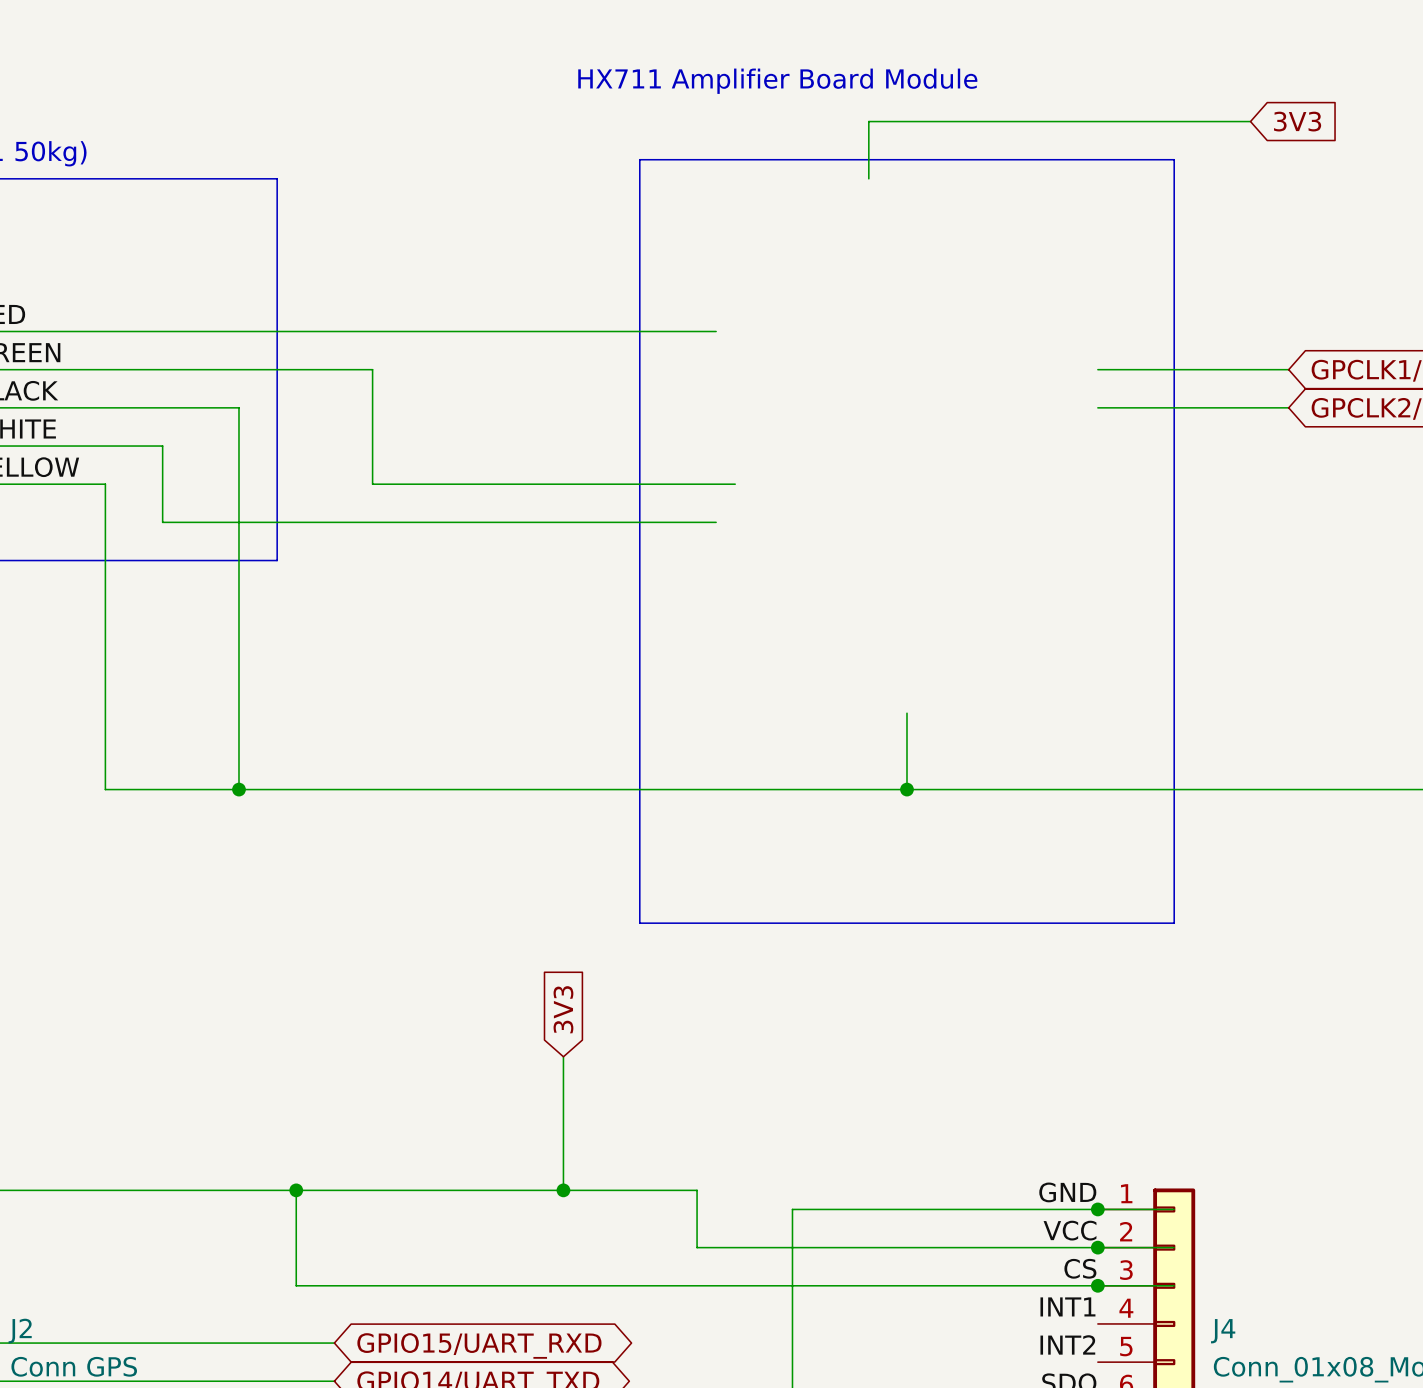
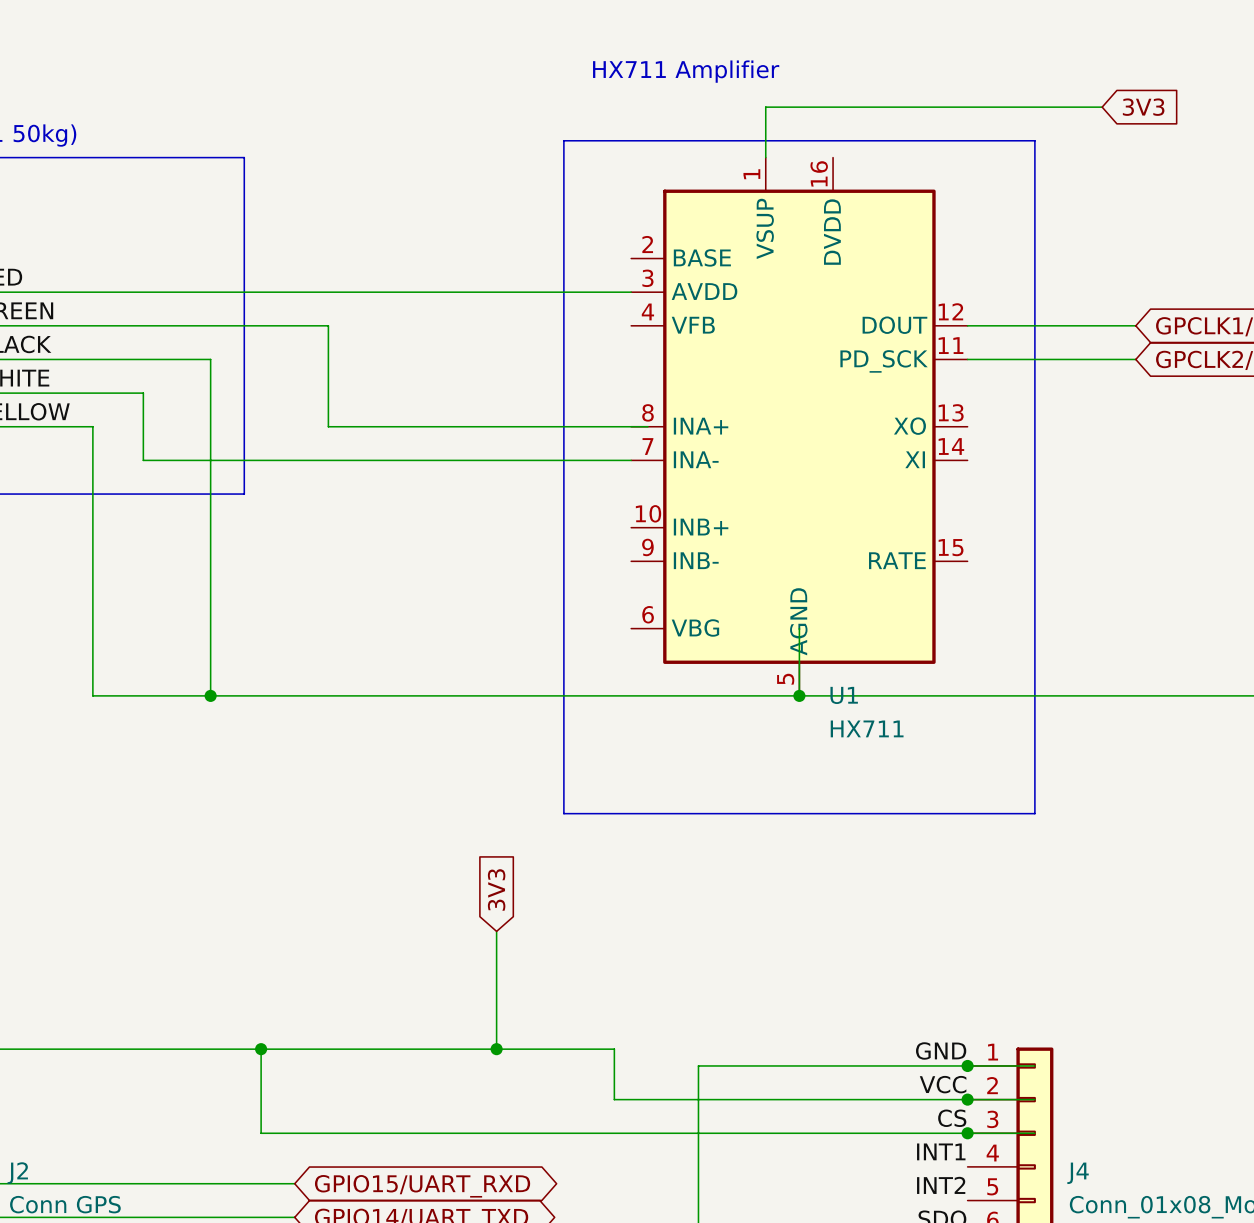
text: HX711 Amplifier Board Module (777, 81) -> HX711 Amplifier (686, 71)
U1: none -> HX711 (799, 426)

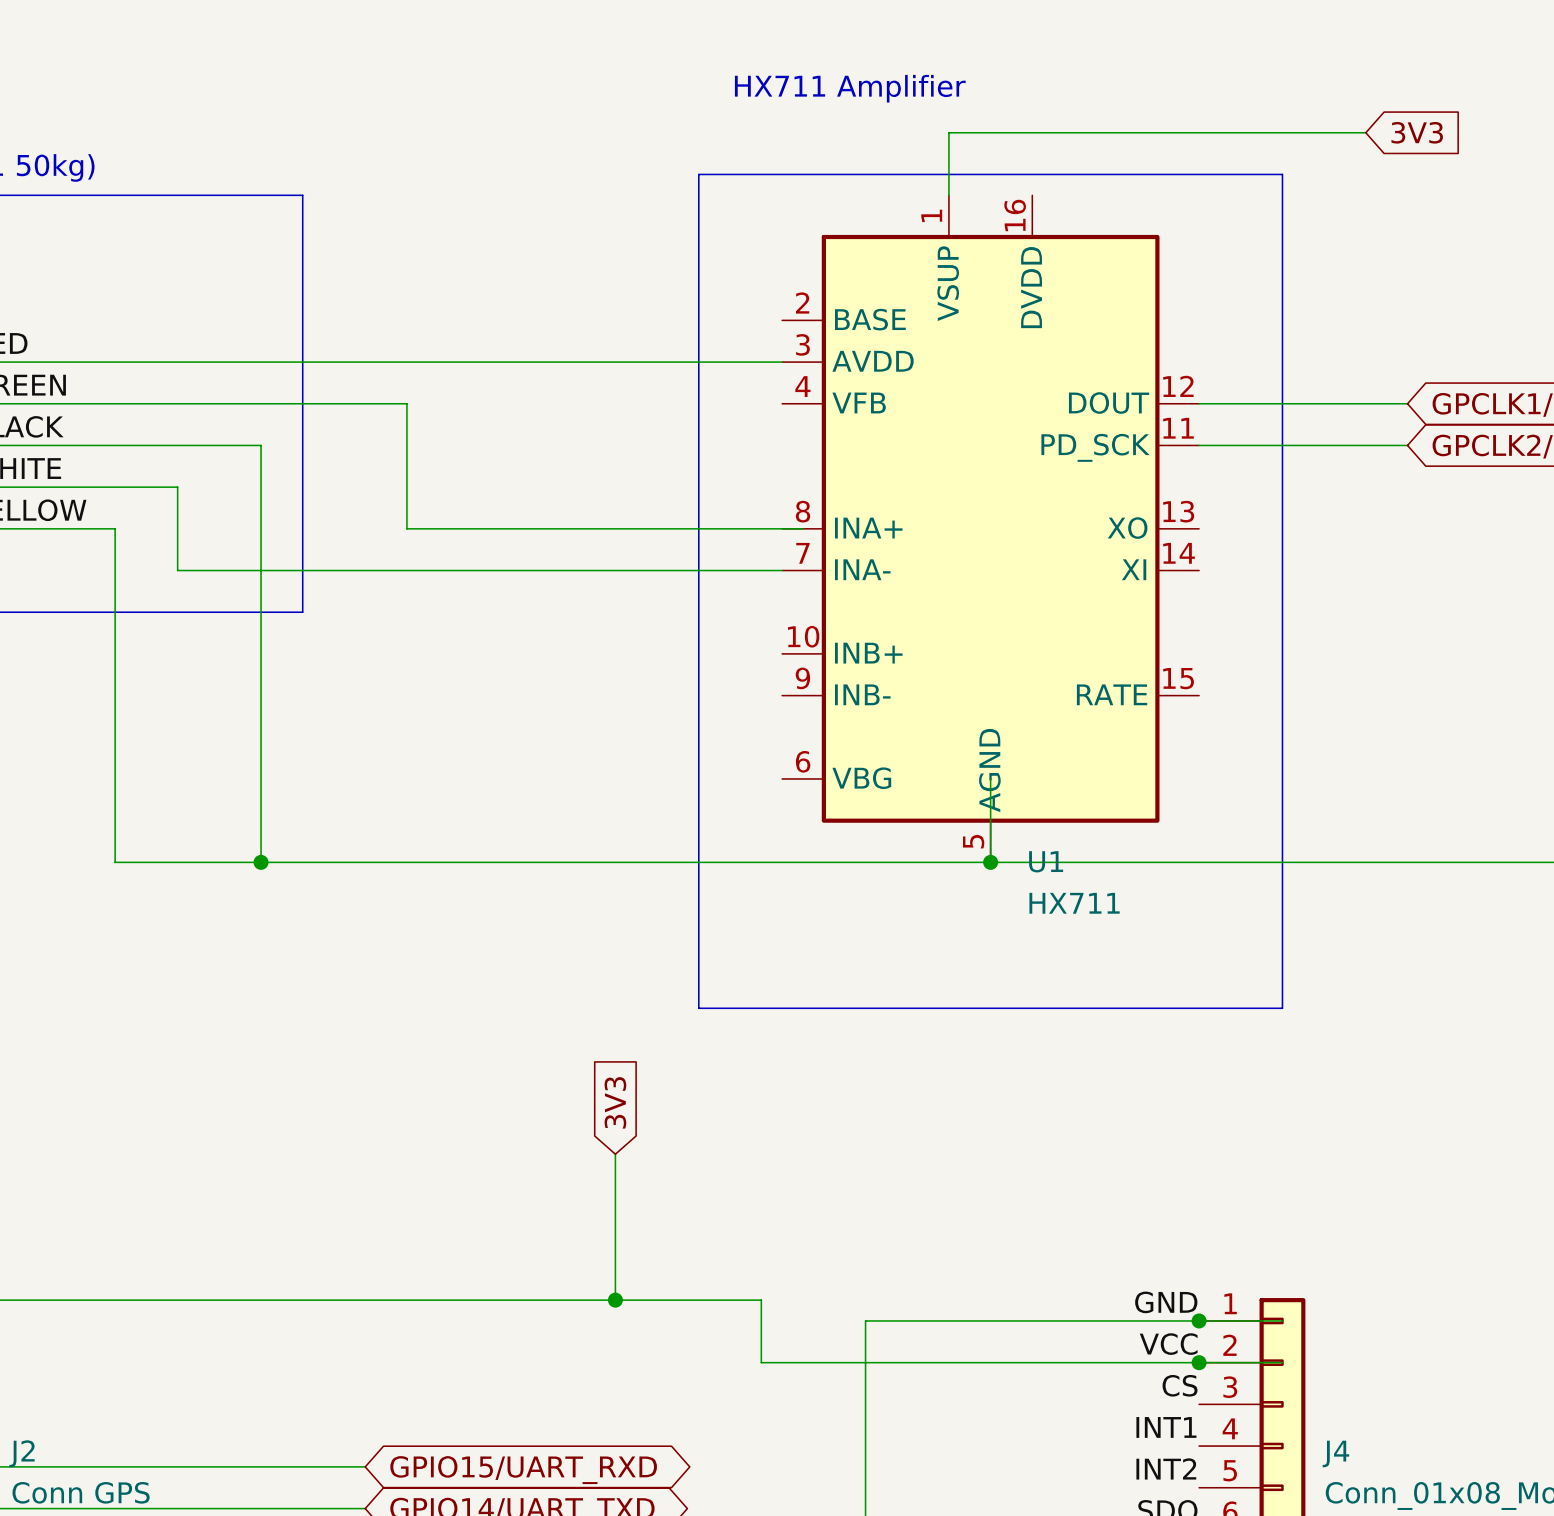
wire: (261, 1049) (261, 1133) (1034, 1133) -> none
junction: (261, 1049) -> none
junction: (967, 1133) -> none

